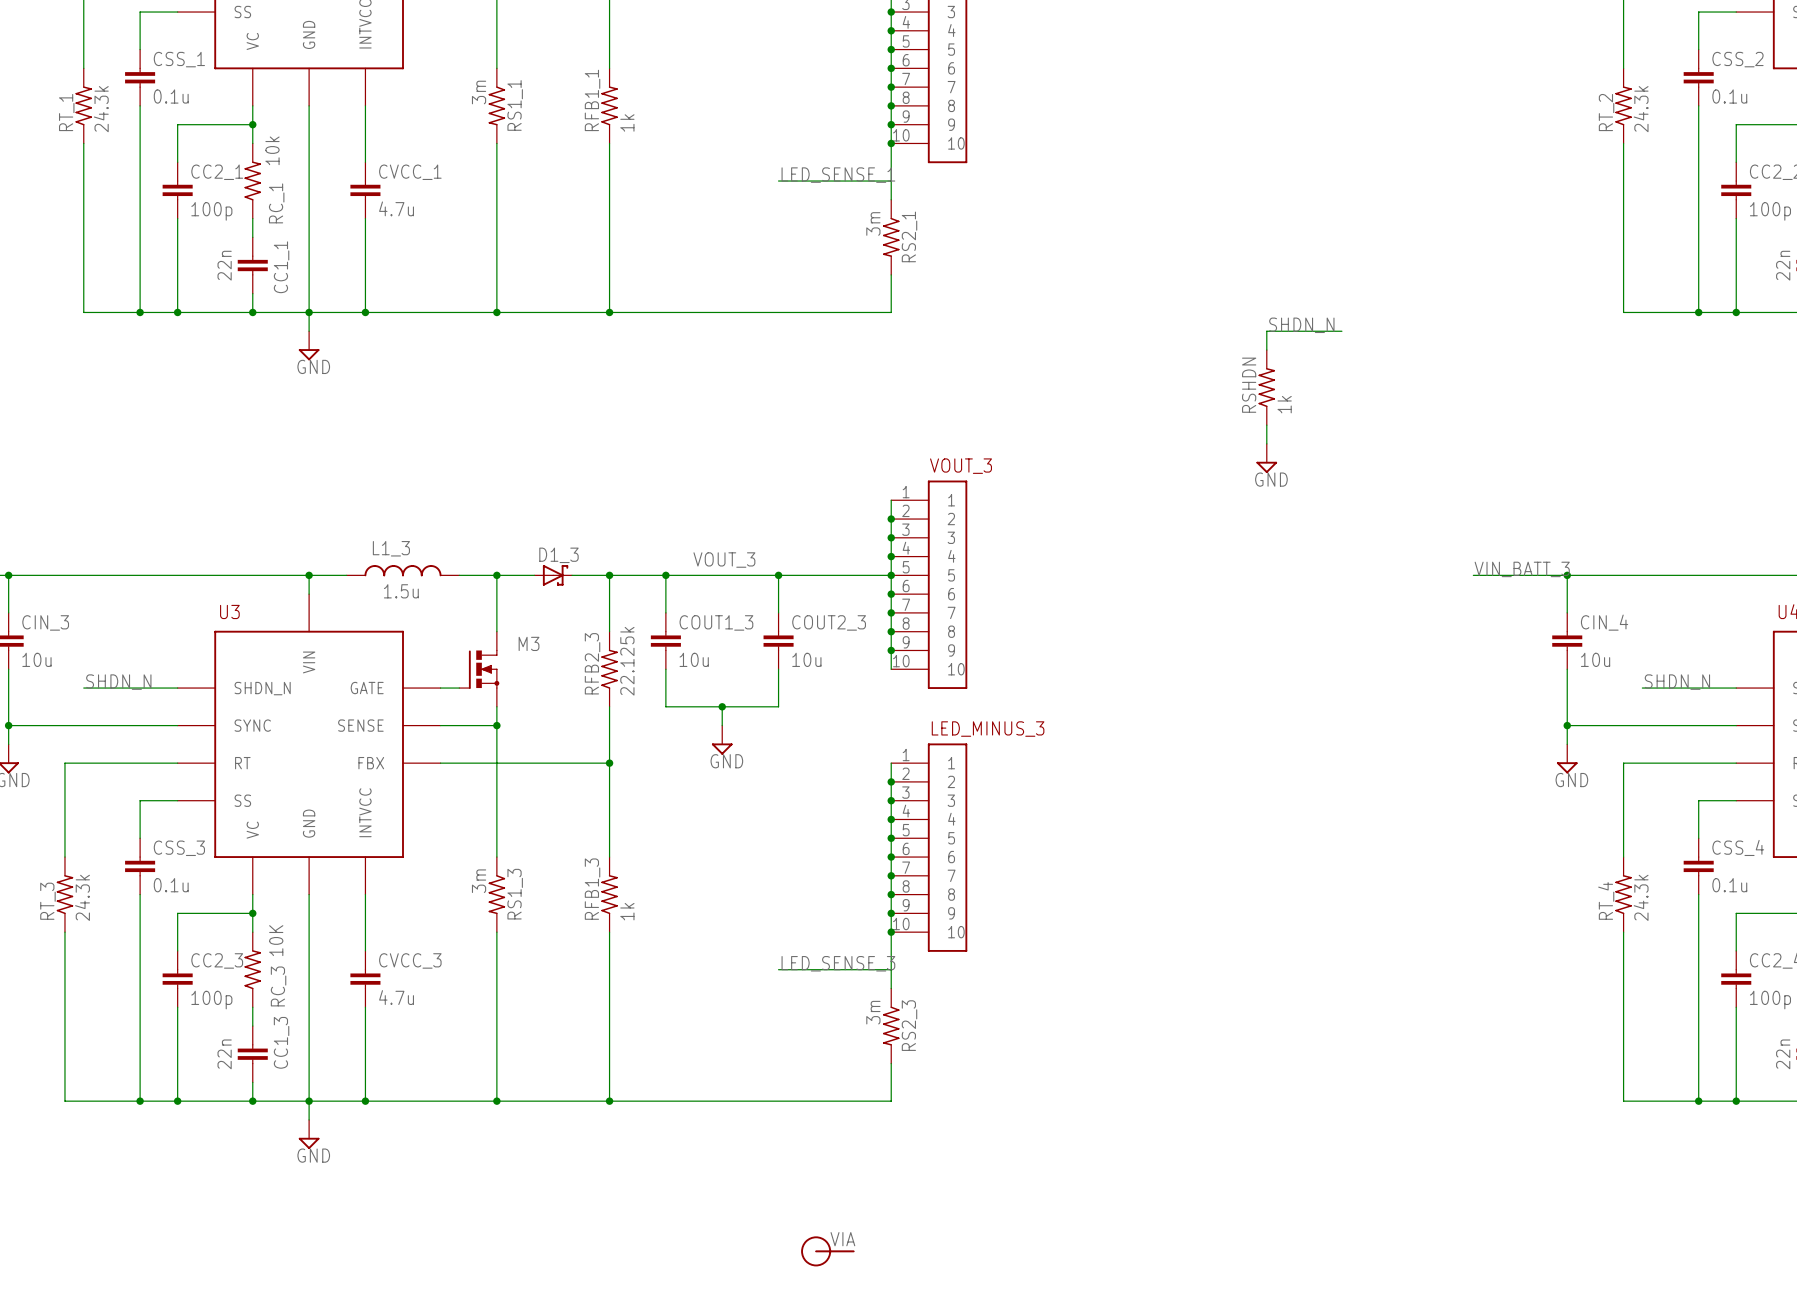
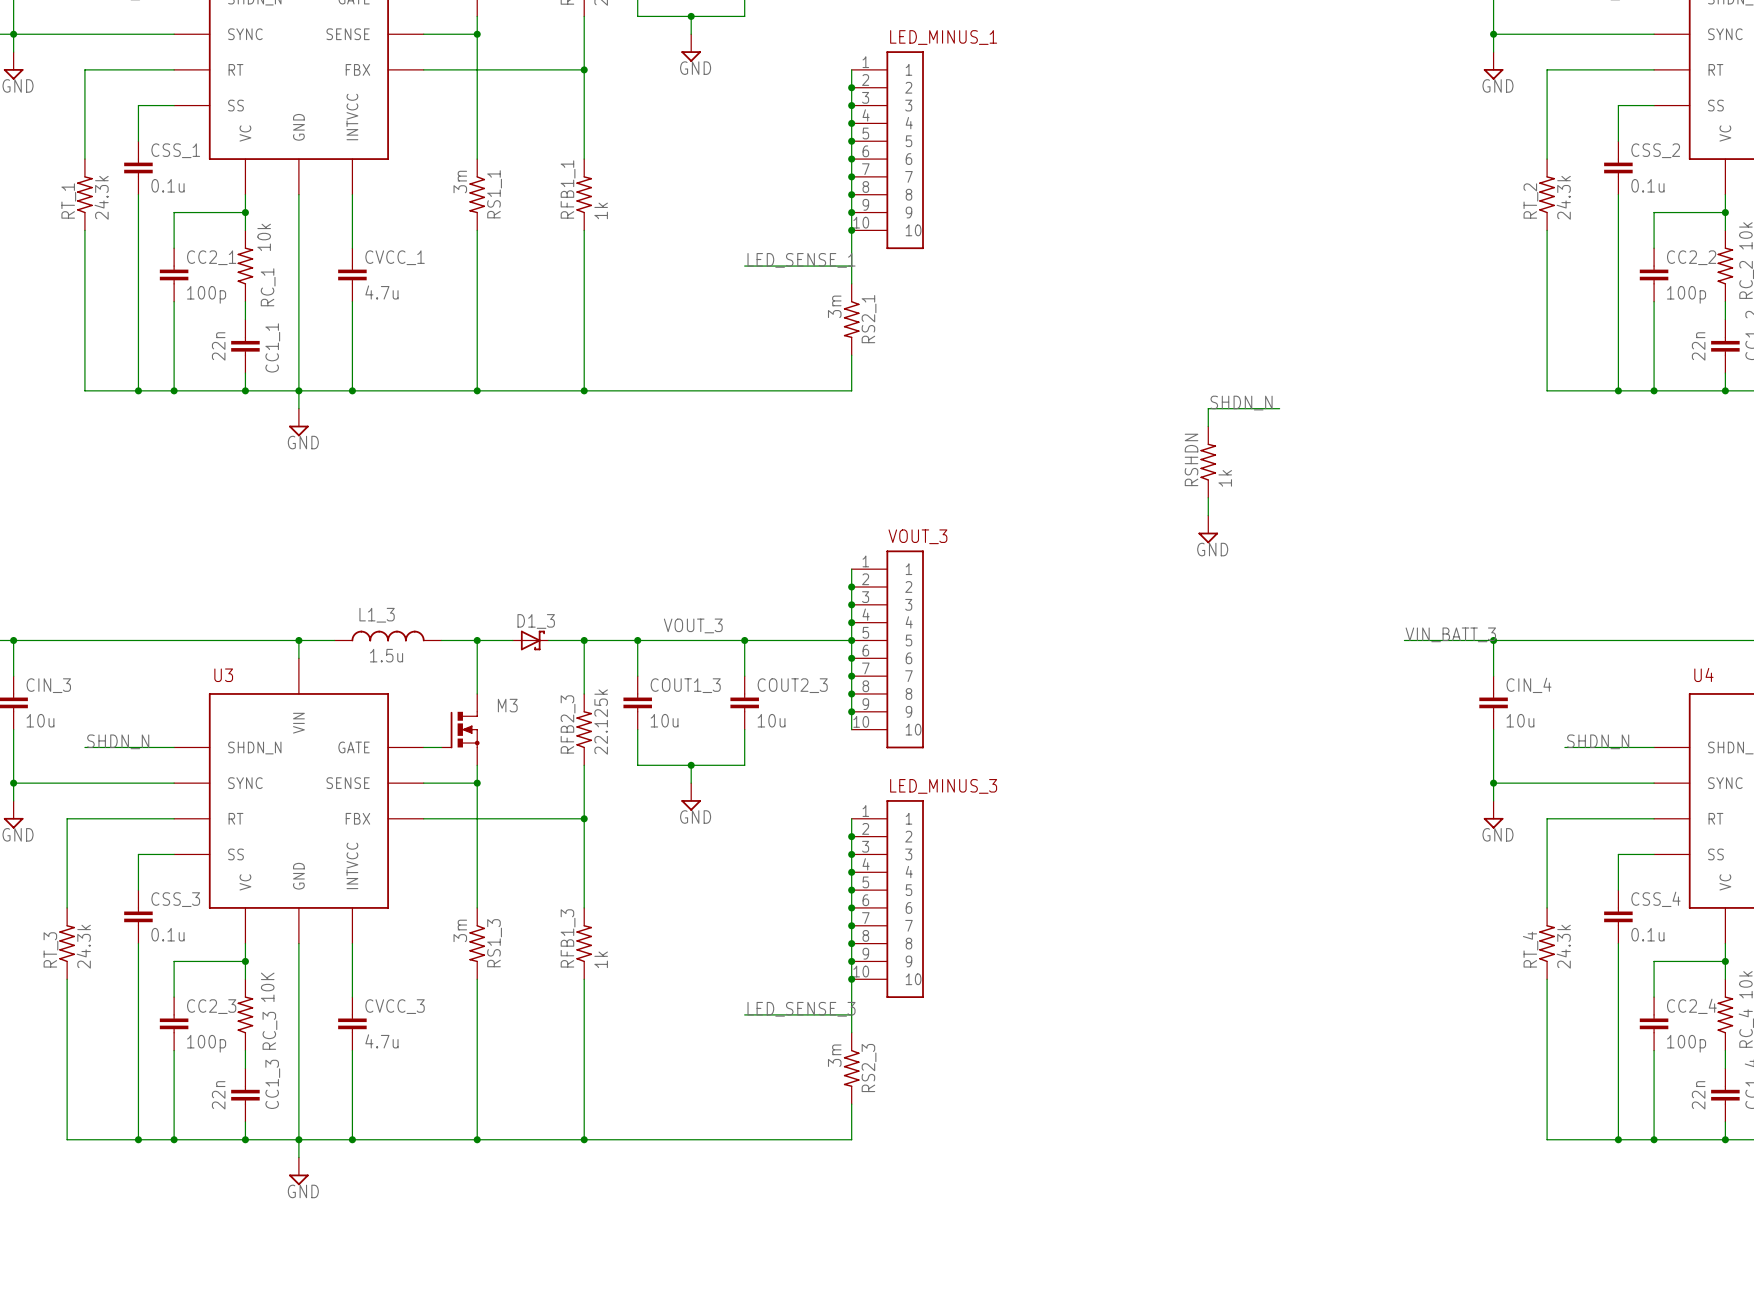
part: (827, 1251) -> none

